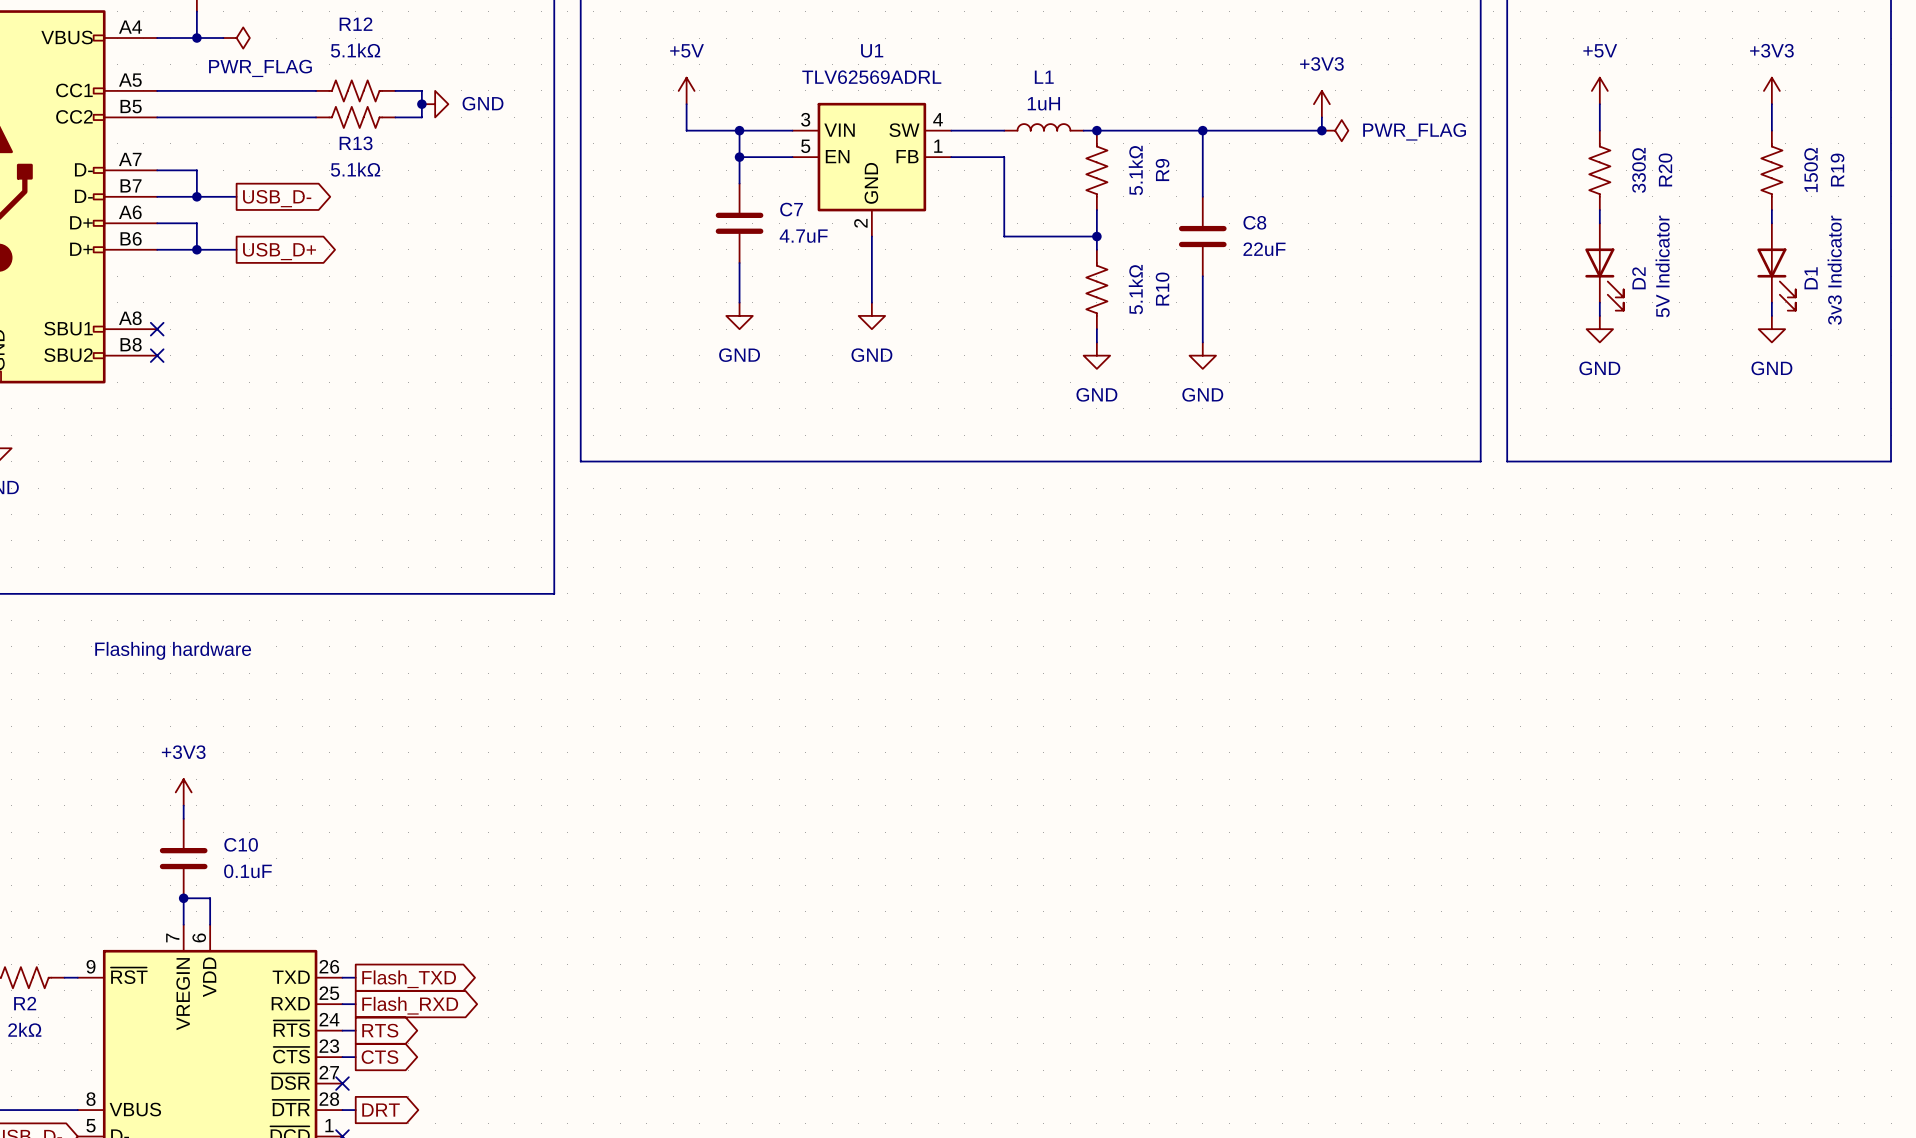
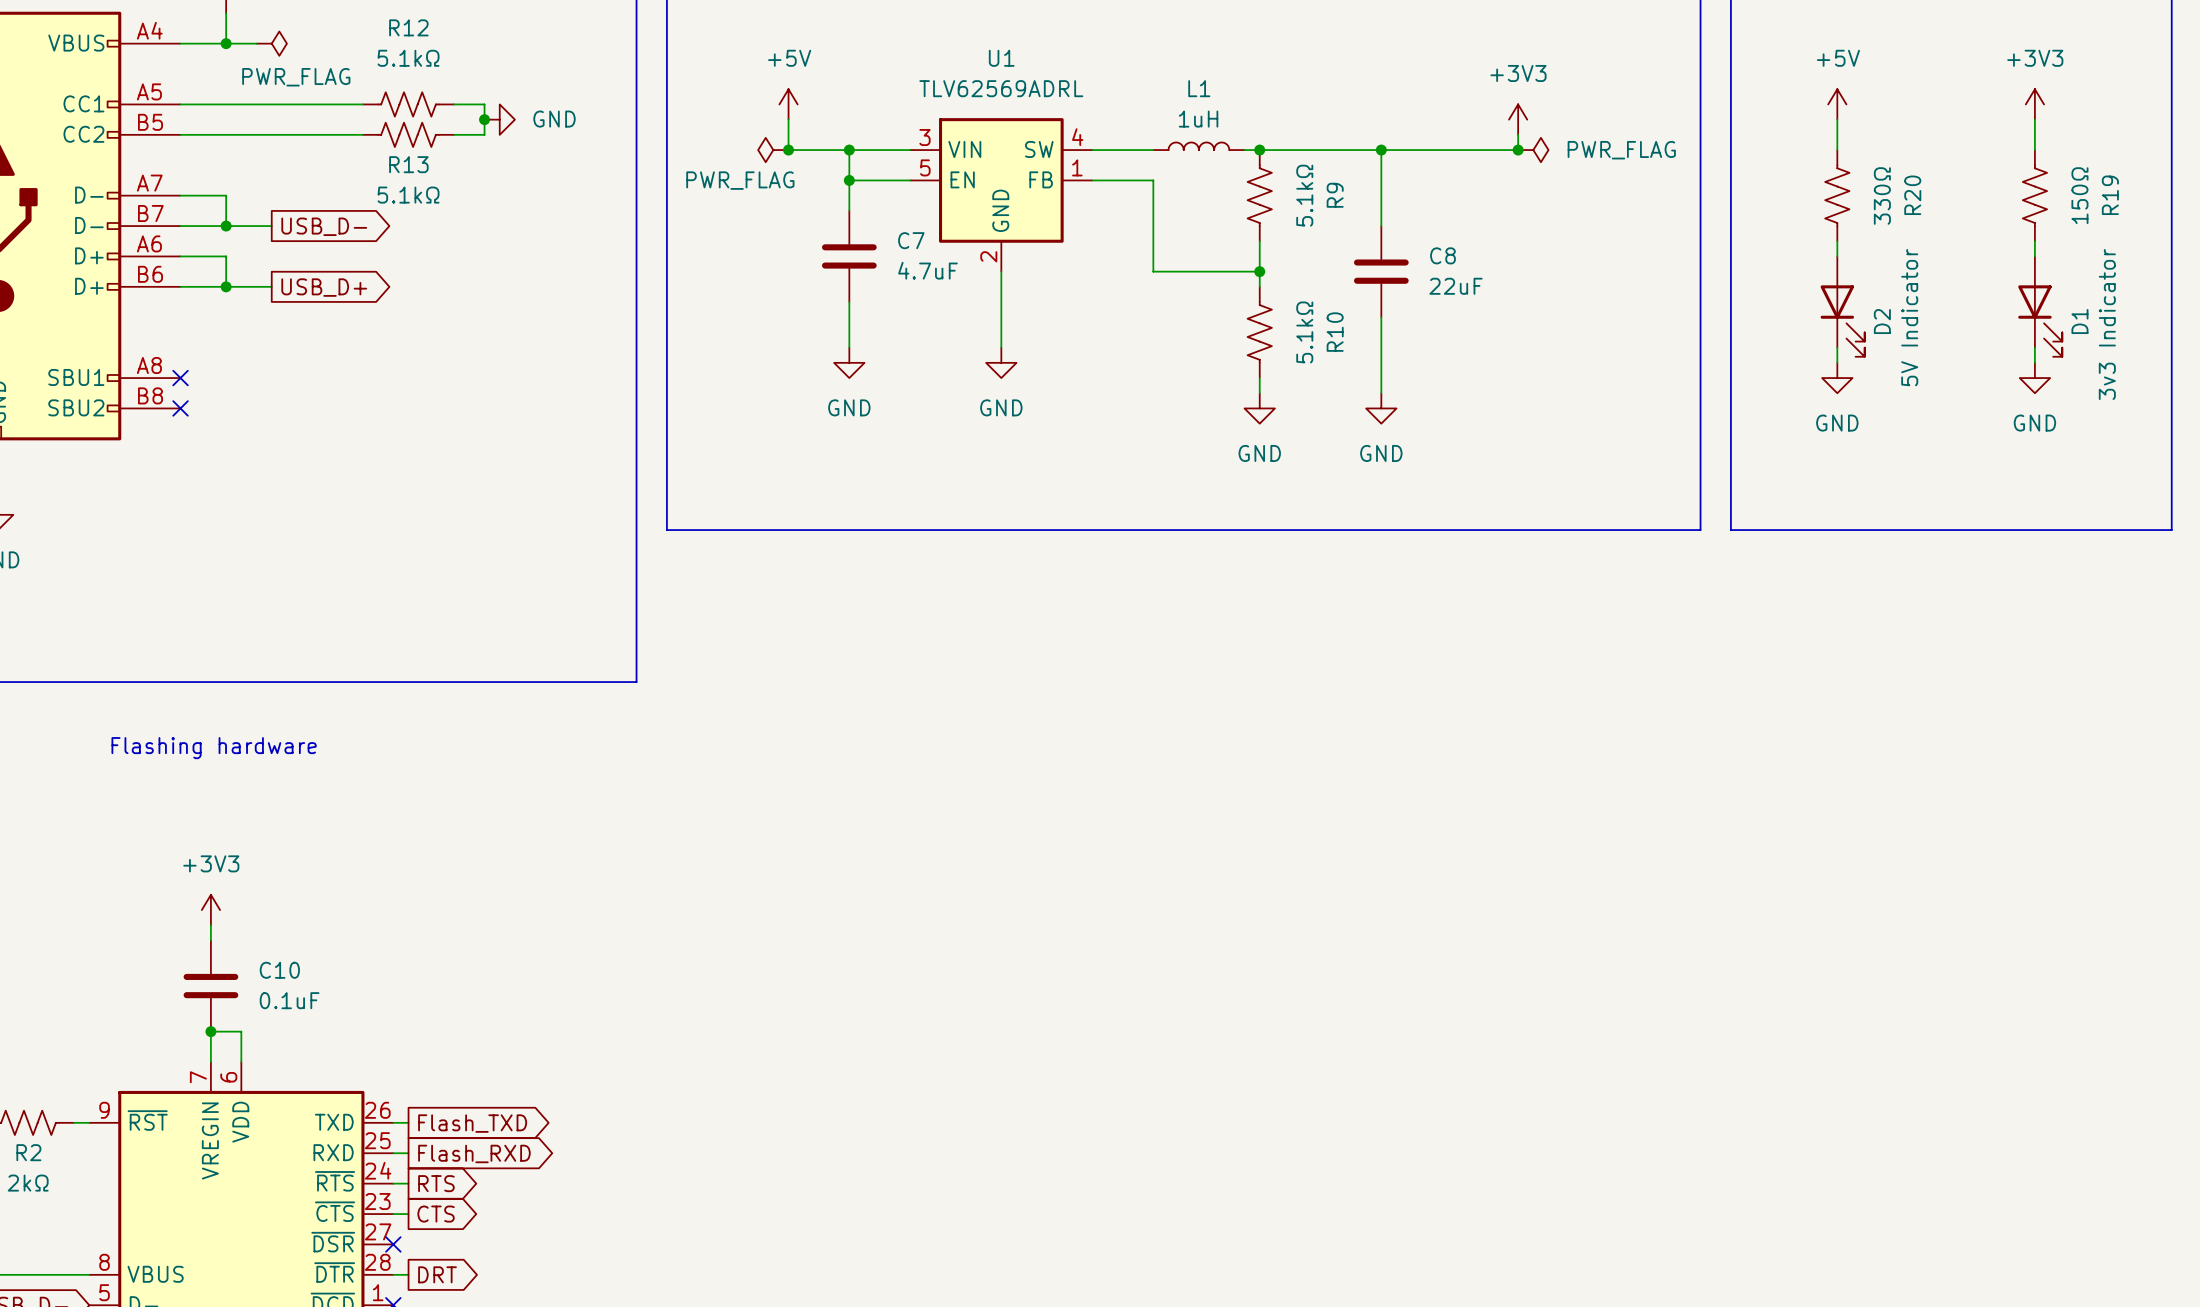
power symbol: none -> PWR_FLAG (773, 150)
junction: none -> (788, 150)

